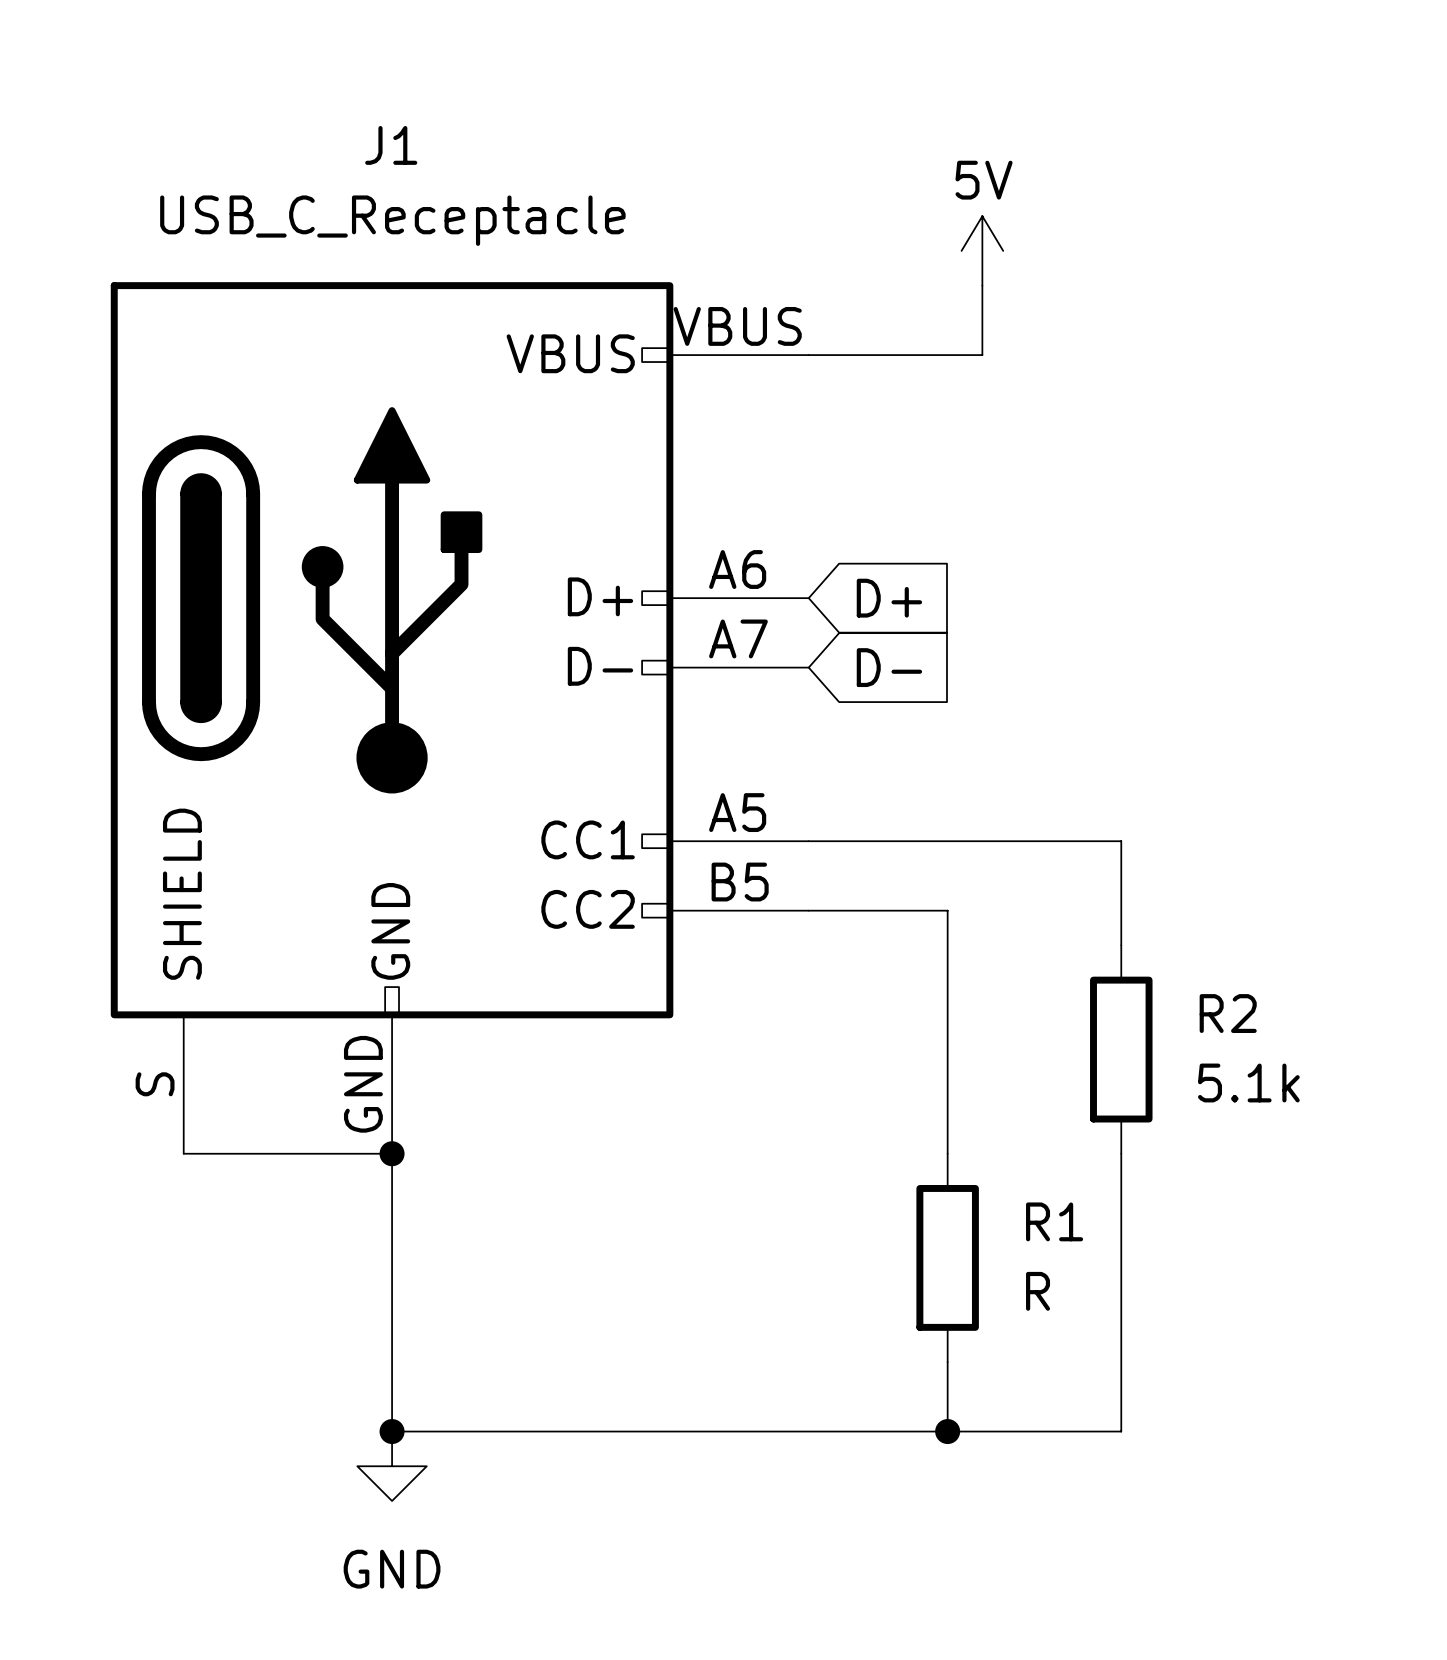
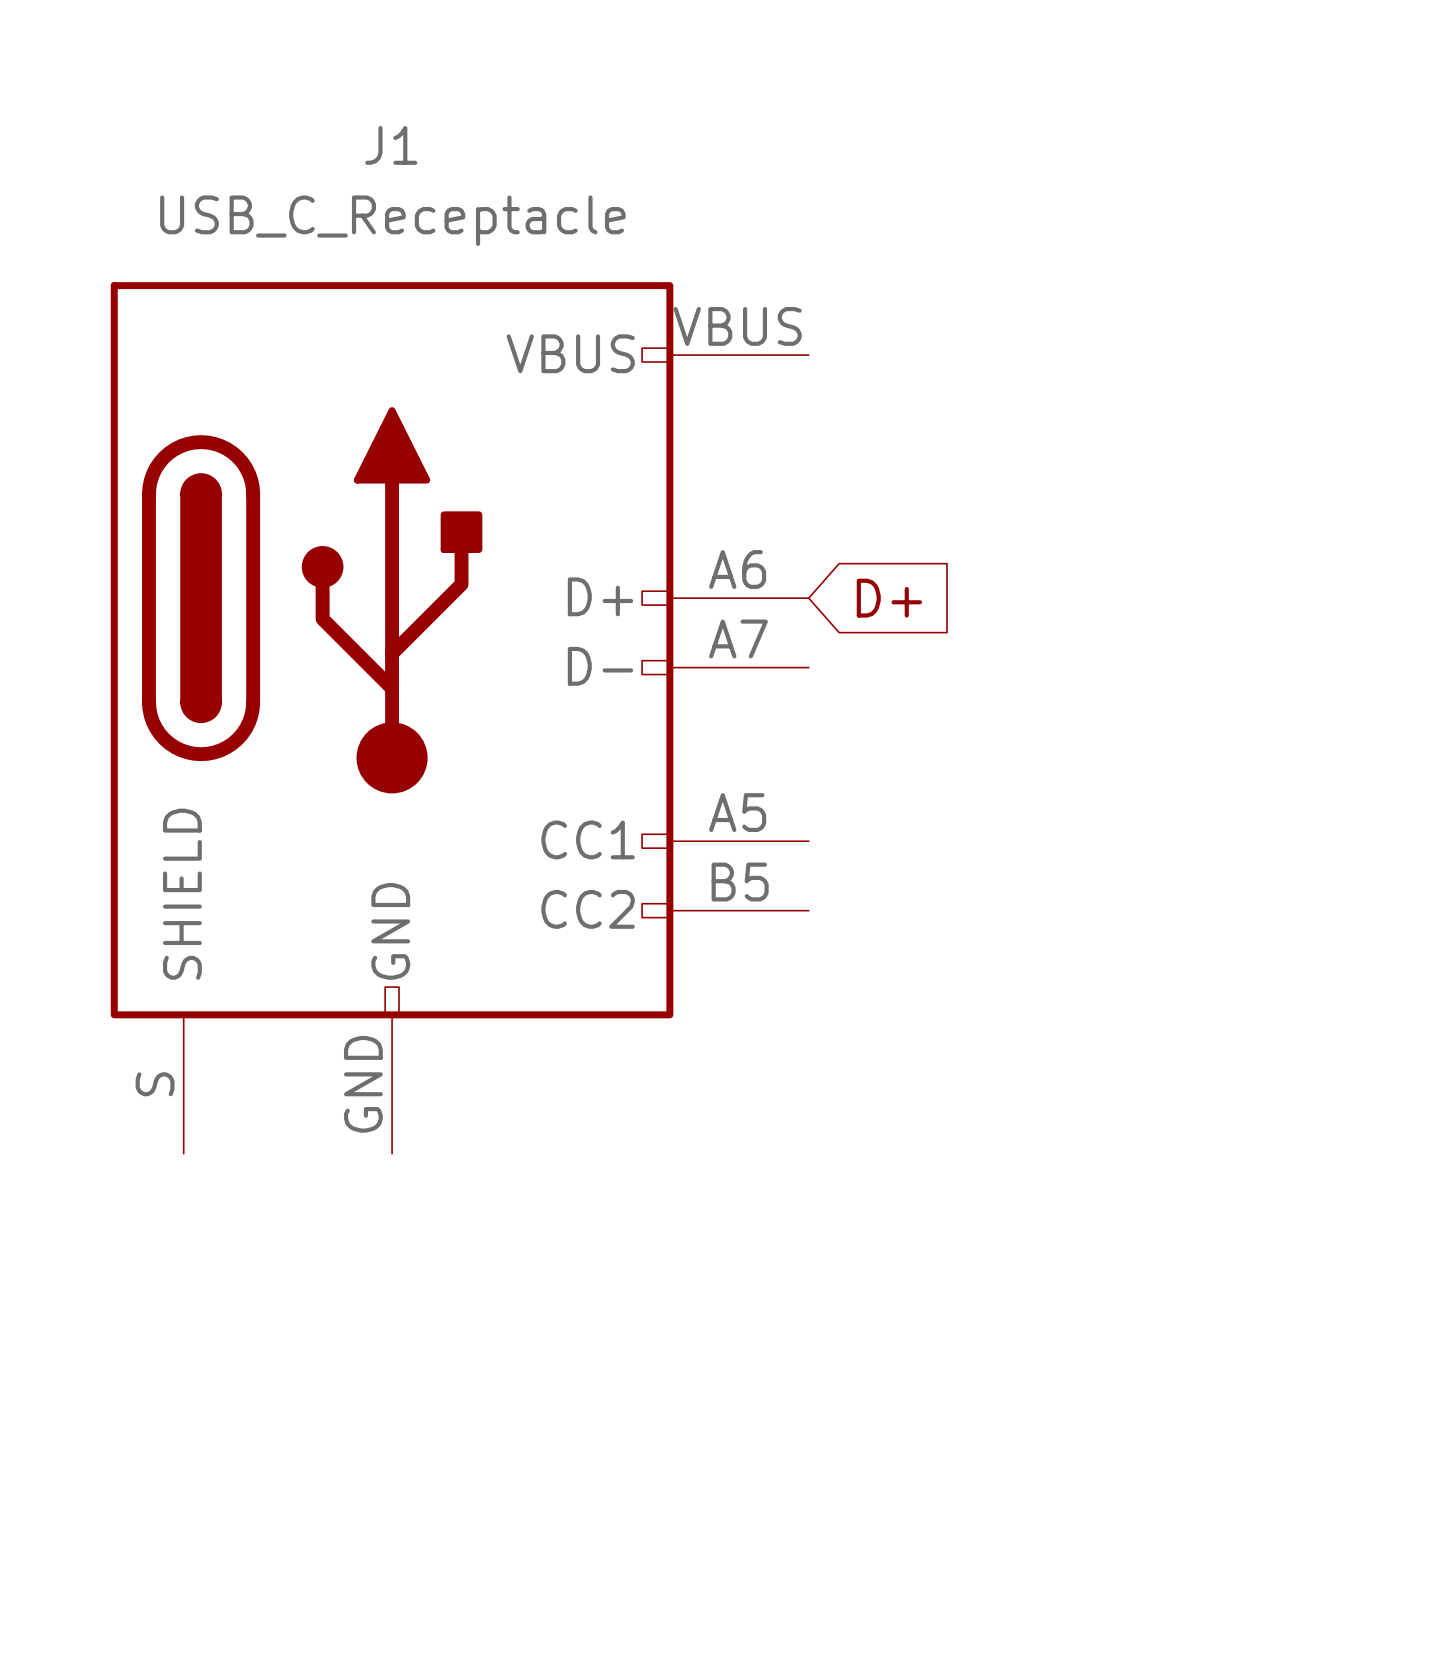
power symbol: 5V (982, 250) -> none
wire: (982, 285) (982, 355) (808, 355) -> none
global label: D- (889, 667) -> none
wire: (808, 841) (1121, 841) (1121, 945) -> none
wire: (808, 910) (947, 910) (947, 1153) -> none
R2: 5.1k (1121, 1049) -> none
wire: (183, 1153) (392, 1153) (392, 1431) (1121, 1431) (1121, 1153) -> none
junction: (392, 1153) -> none
R1: R (947, 1257) -> none
wire: (947, 1362) (947, 1431) -> none
junction: (392, 1431) -> none
junction: (947, 1431) -> none
power symbol: GND (392, 1466) -> none

